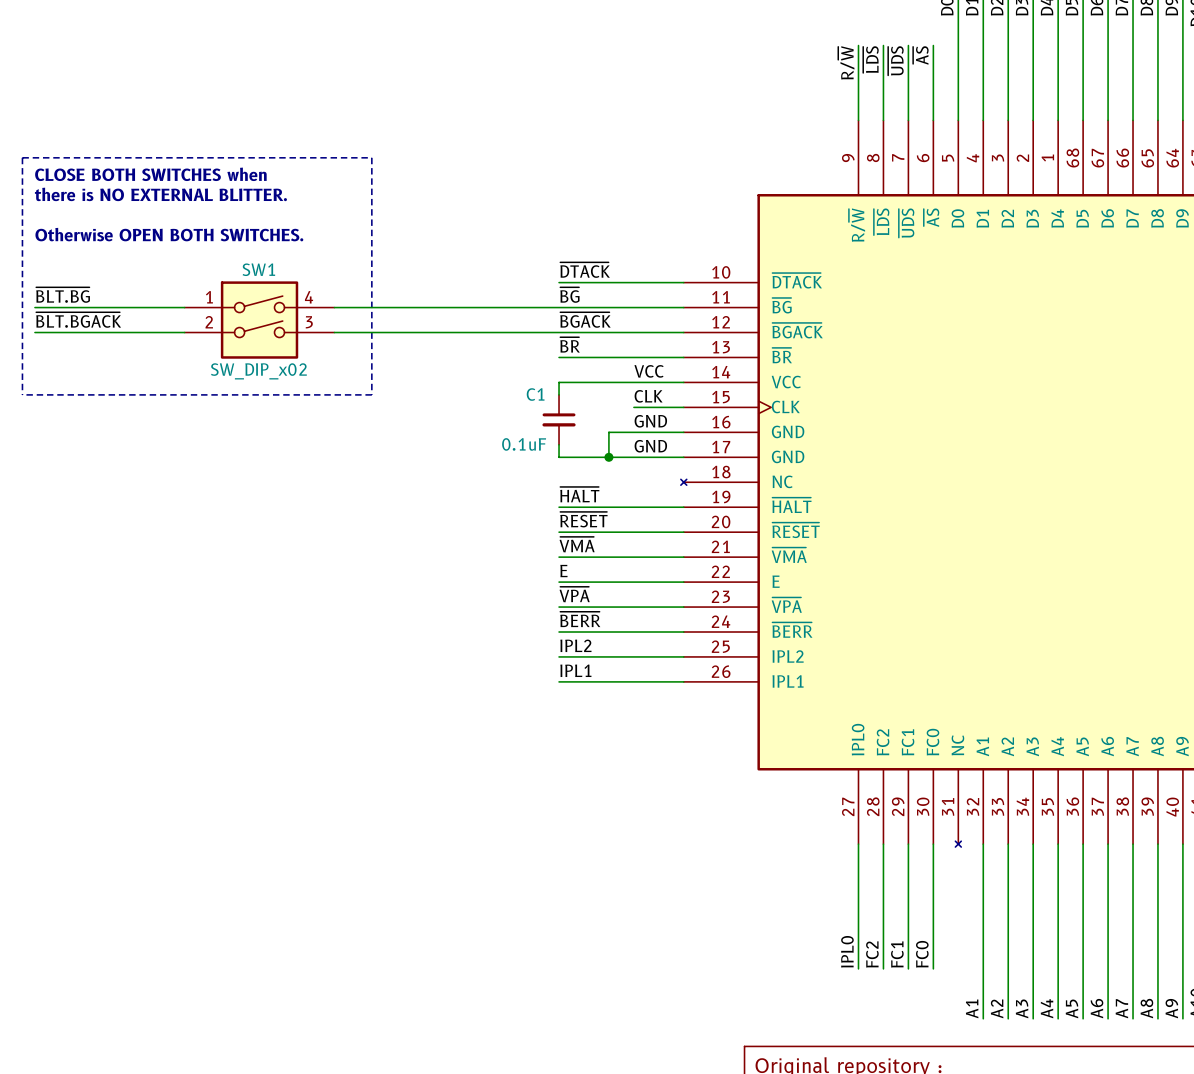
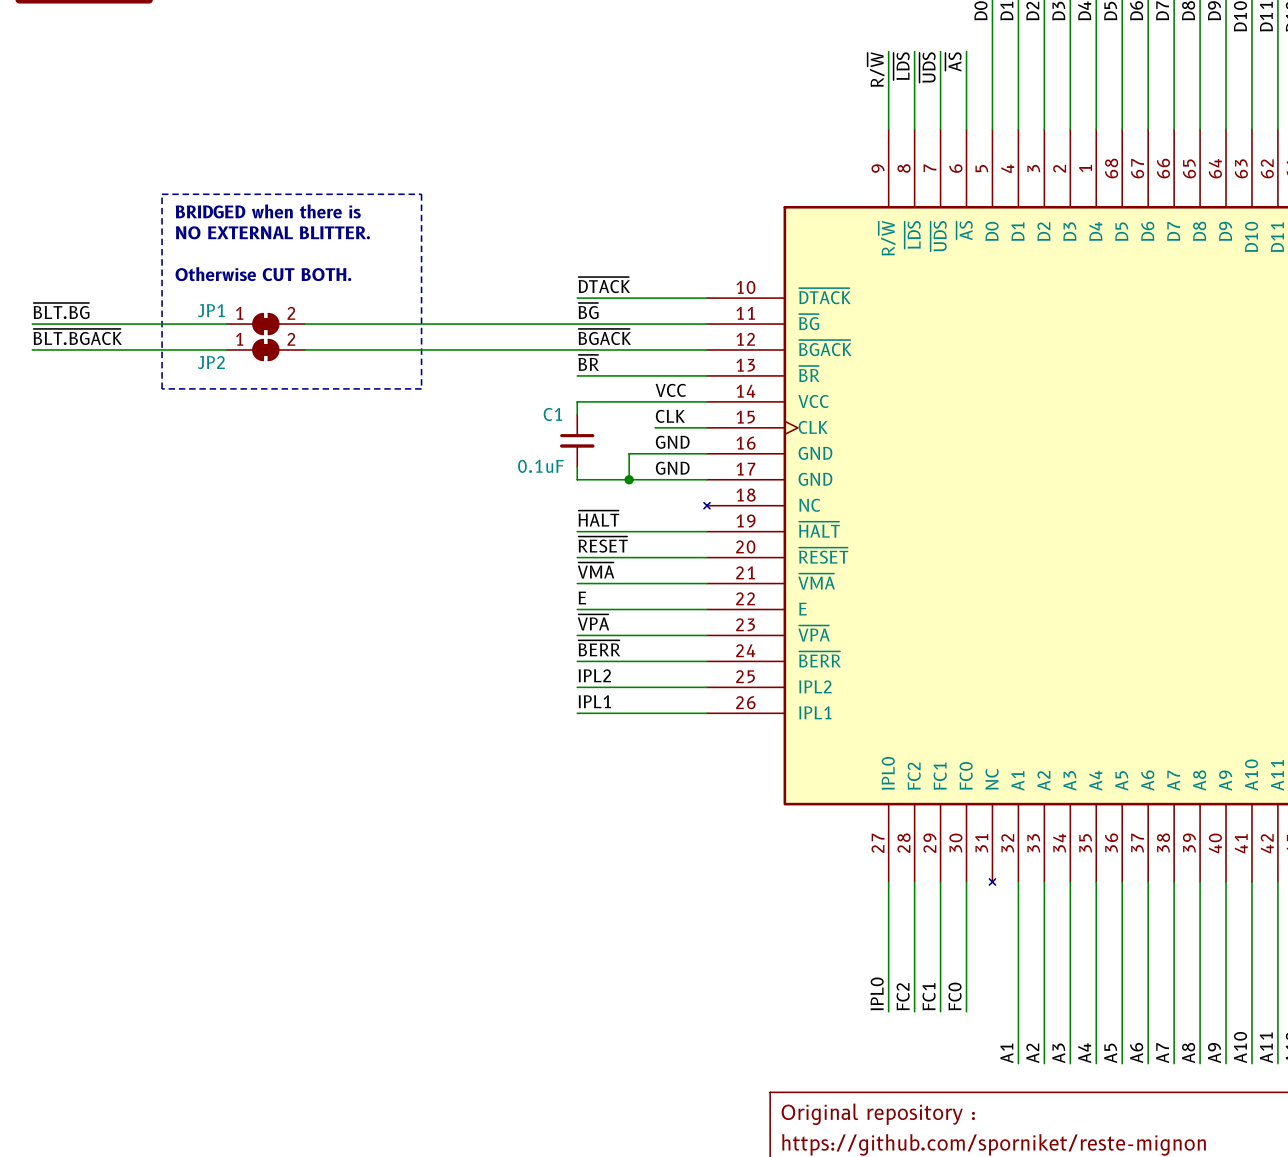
line: (22, 157) (22, 394) (371, 394) (371, 157) (22, 157) -> none
text: CLOSE BOTH SWITCHES when (150, 174) -> none
line: none -> (162, 194) (421, 194) (421, 388) (162, 388) (162, 194)
text: there is NO EXTERNAL BLITTER. (160, 194) -> NO EXTERNAL BLITTER. (272, 232)
text: none -> BRIDGED when there is (268, 211)
text: Otherwise OPEN BOTH SWITCHES. (169, 234) -> Otherwise CUT BOTH. (263, 274)
JP1: none -> (265, 324)
SW1: SW_DIP_x02 (259, 320) -> none
JP2: none -> (265, 349)

